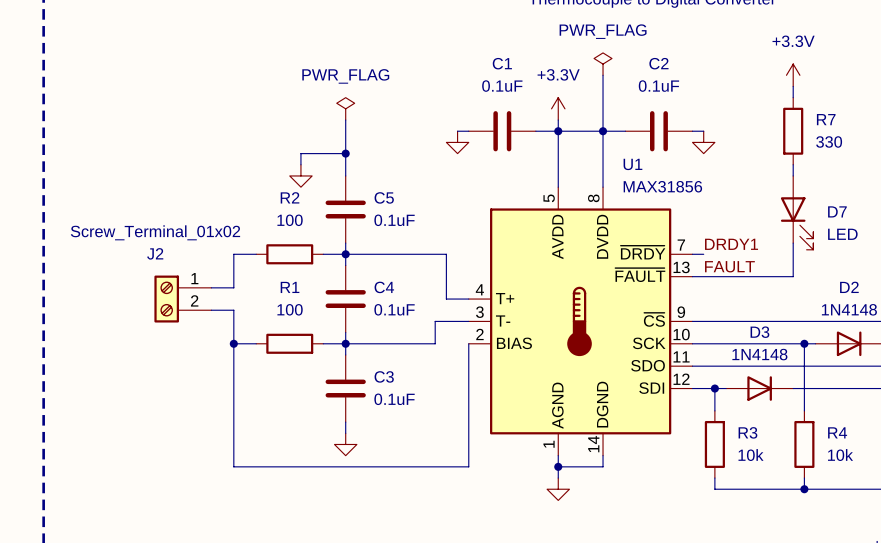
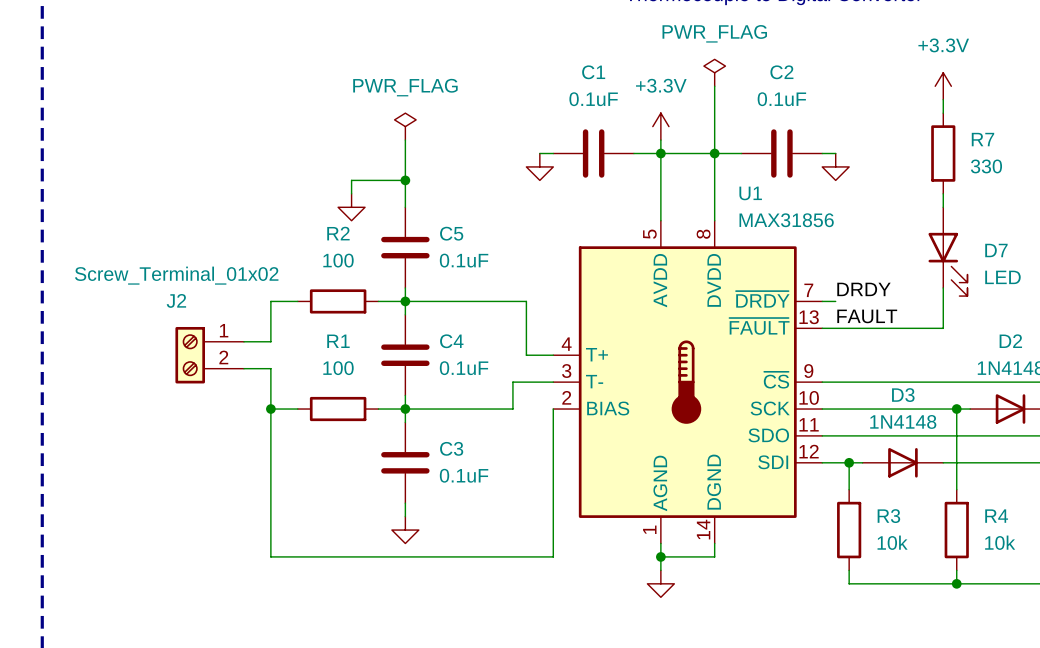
label: DRDY1 (731, 244) -> DRDY (863, 289)

